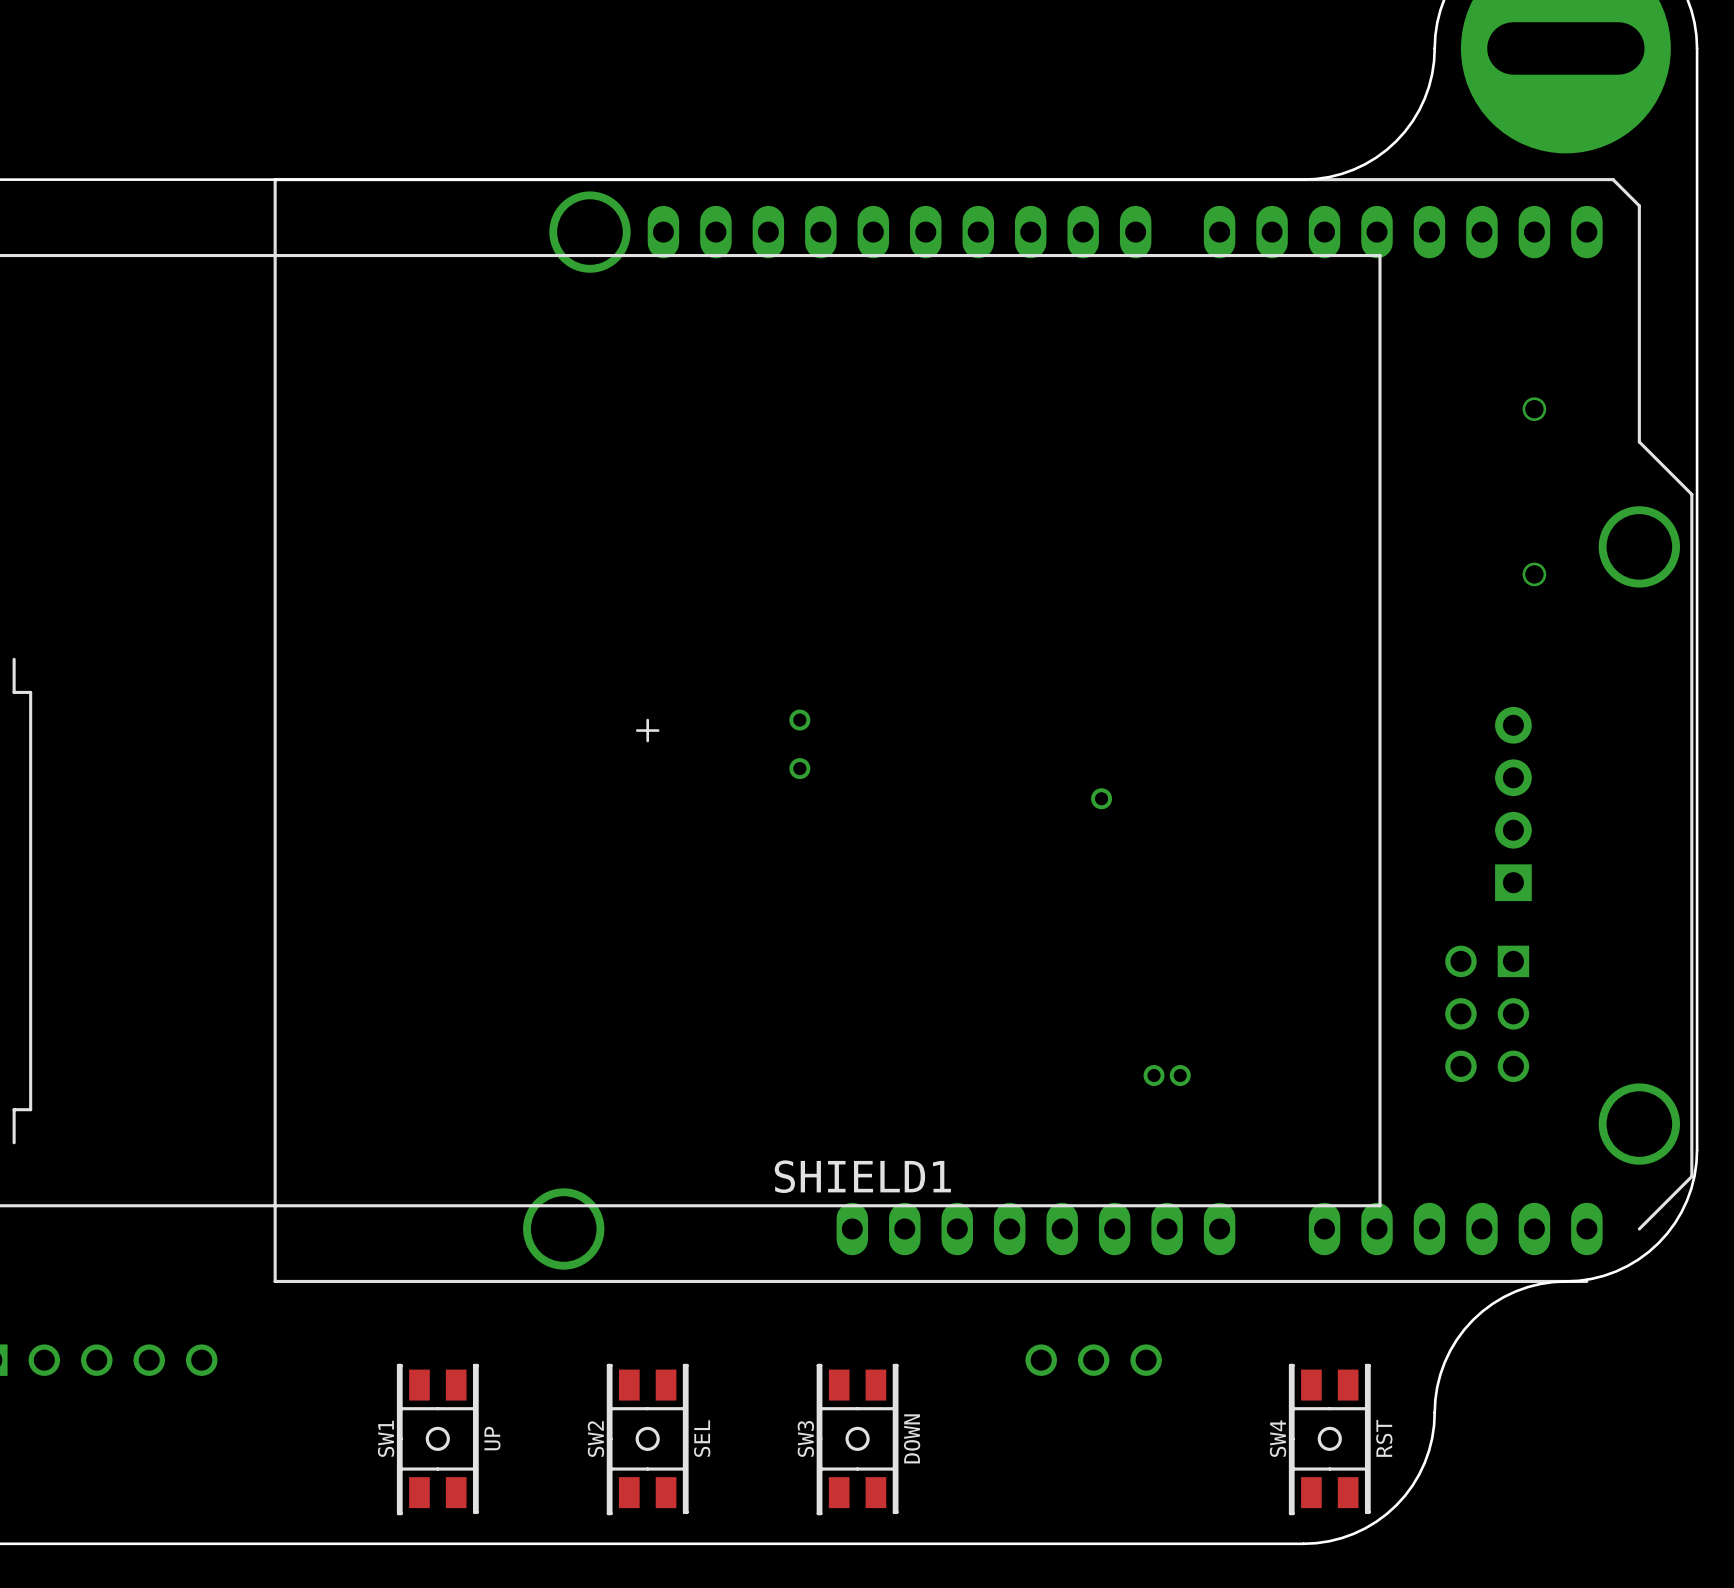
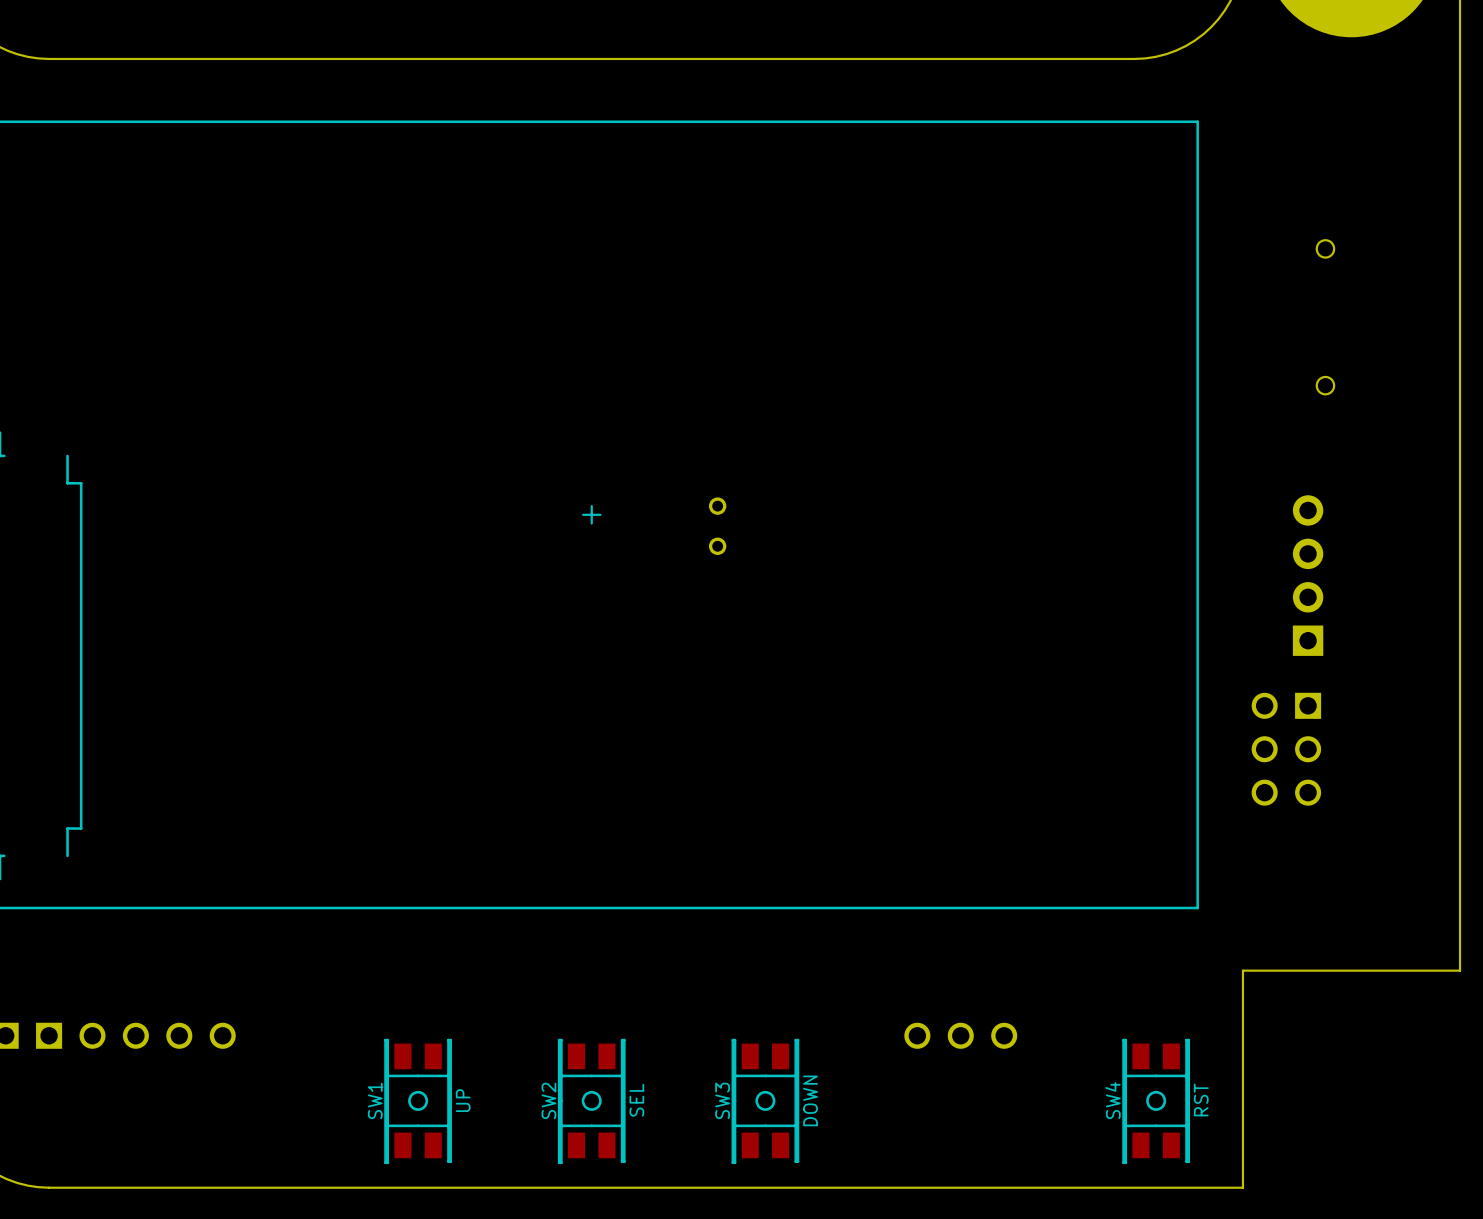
SHIELD1: (983, 730) -> none
part: (1101, 798) -> none
part: (1154, 1075) -> none
part: (1180, 1075) -> none
board edge: (1697, 1150) (1694, 1175) (1681, 1212) (1667, 1233) (1649, 1251) (1627, 1265) (1603, 1275) (1578, 1280) (1540, 1283) (1515, 1291) (1493, 1303) (1473, 1319) (1456, 1339) (1444, 1362) (1437, 1387) (1434, 1425) (1429, 1450) (1419, 1474) (1404, 1495) (1386, 1514) (1365, 1528) (1329, 1541) (1303, 1543) -> (1460, 862) (1460, 970) (1242, 970) (1242, 1187) (1134, 1187)

